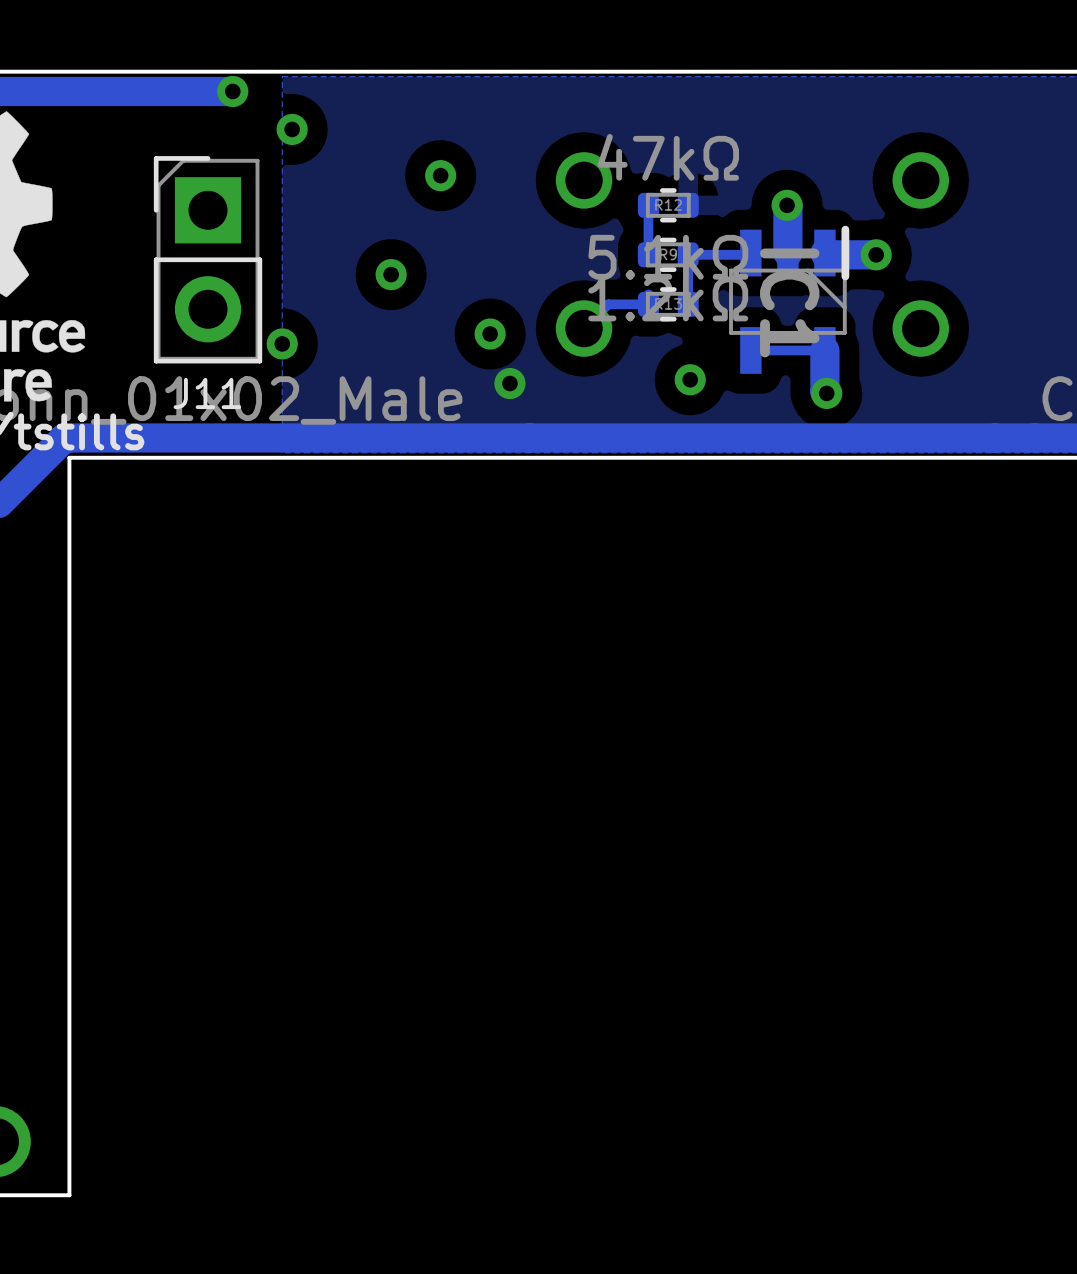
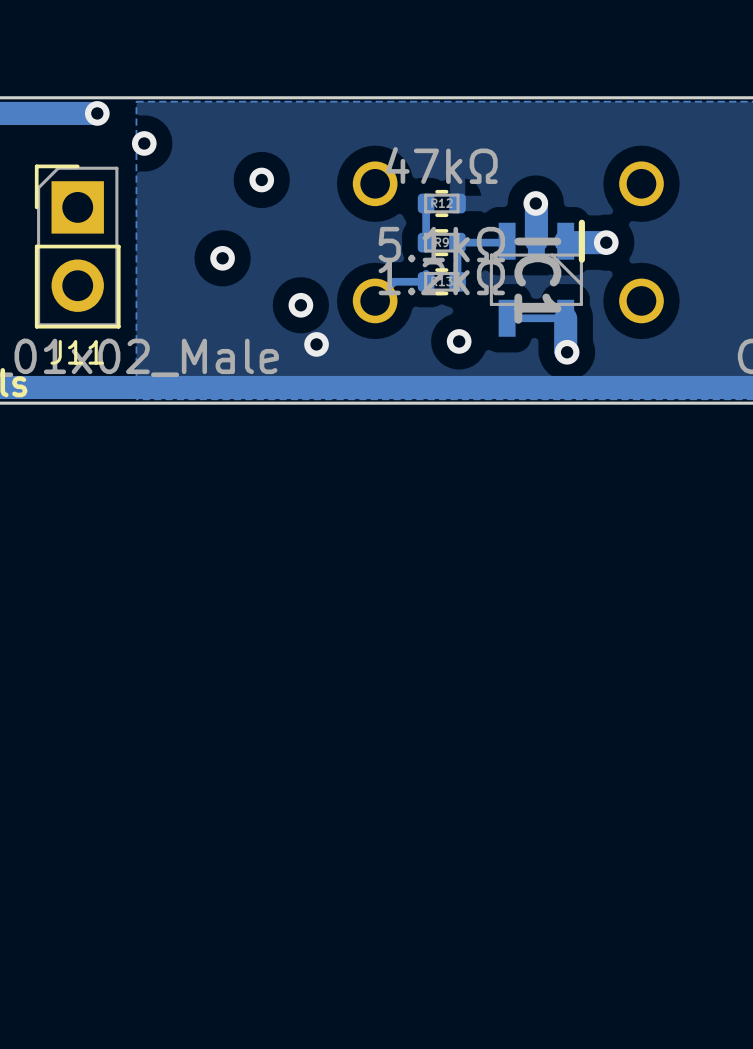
via: (282, 343) -> none

